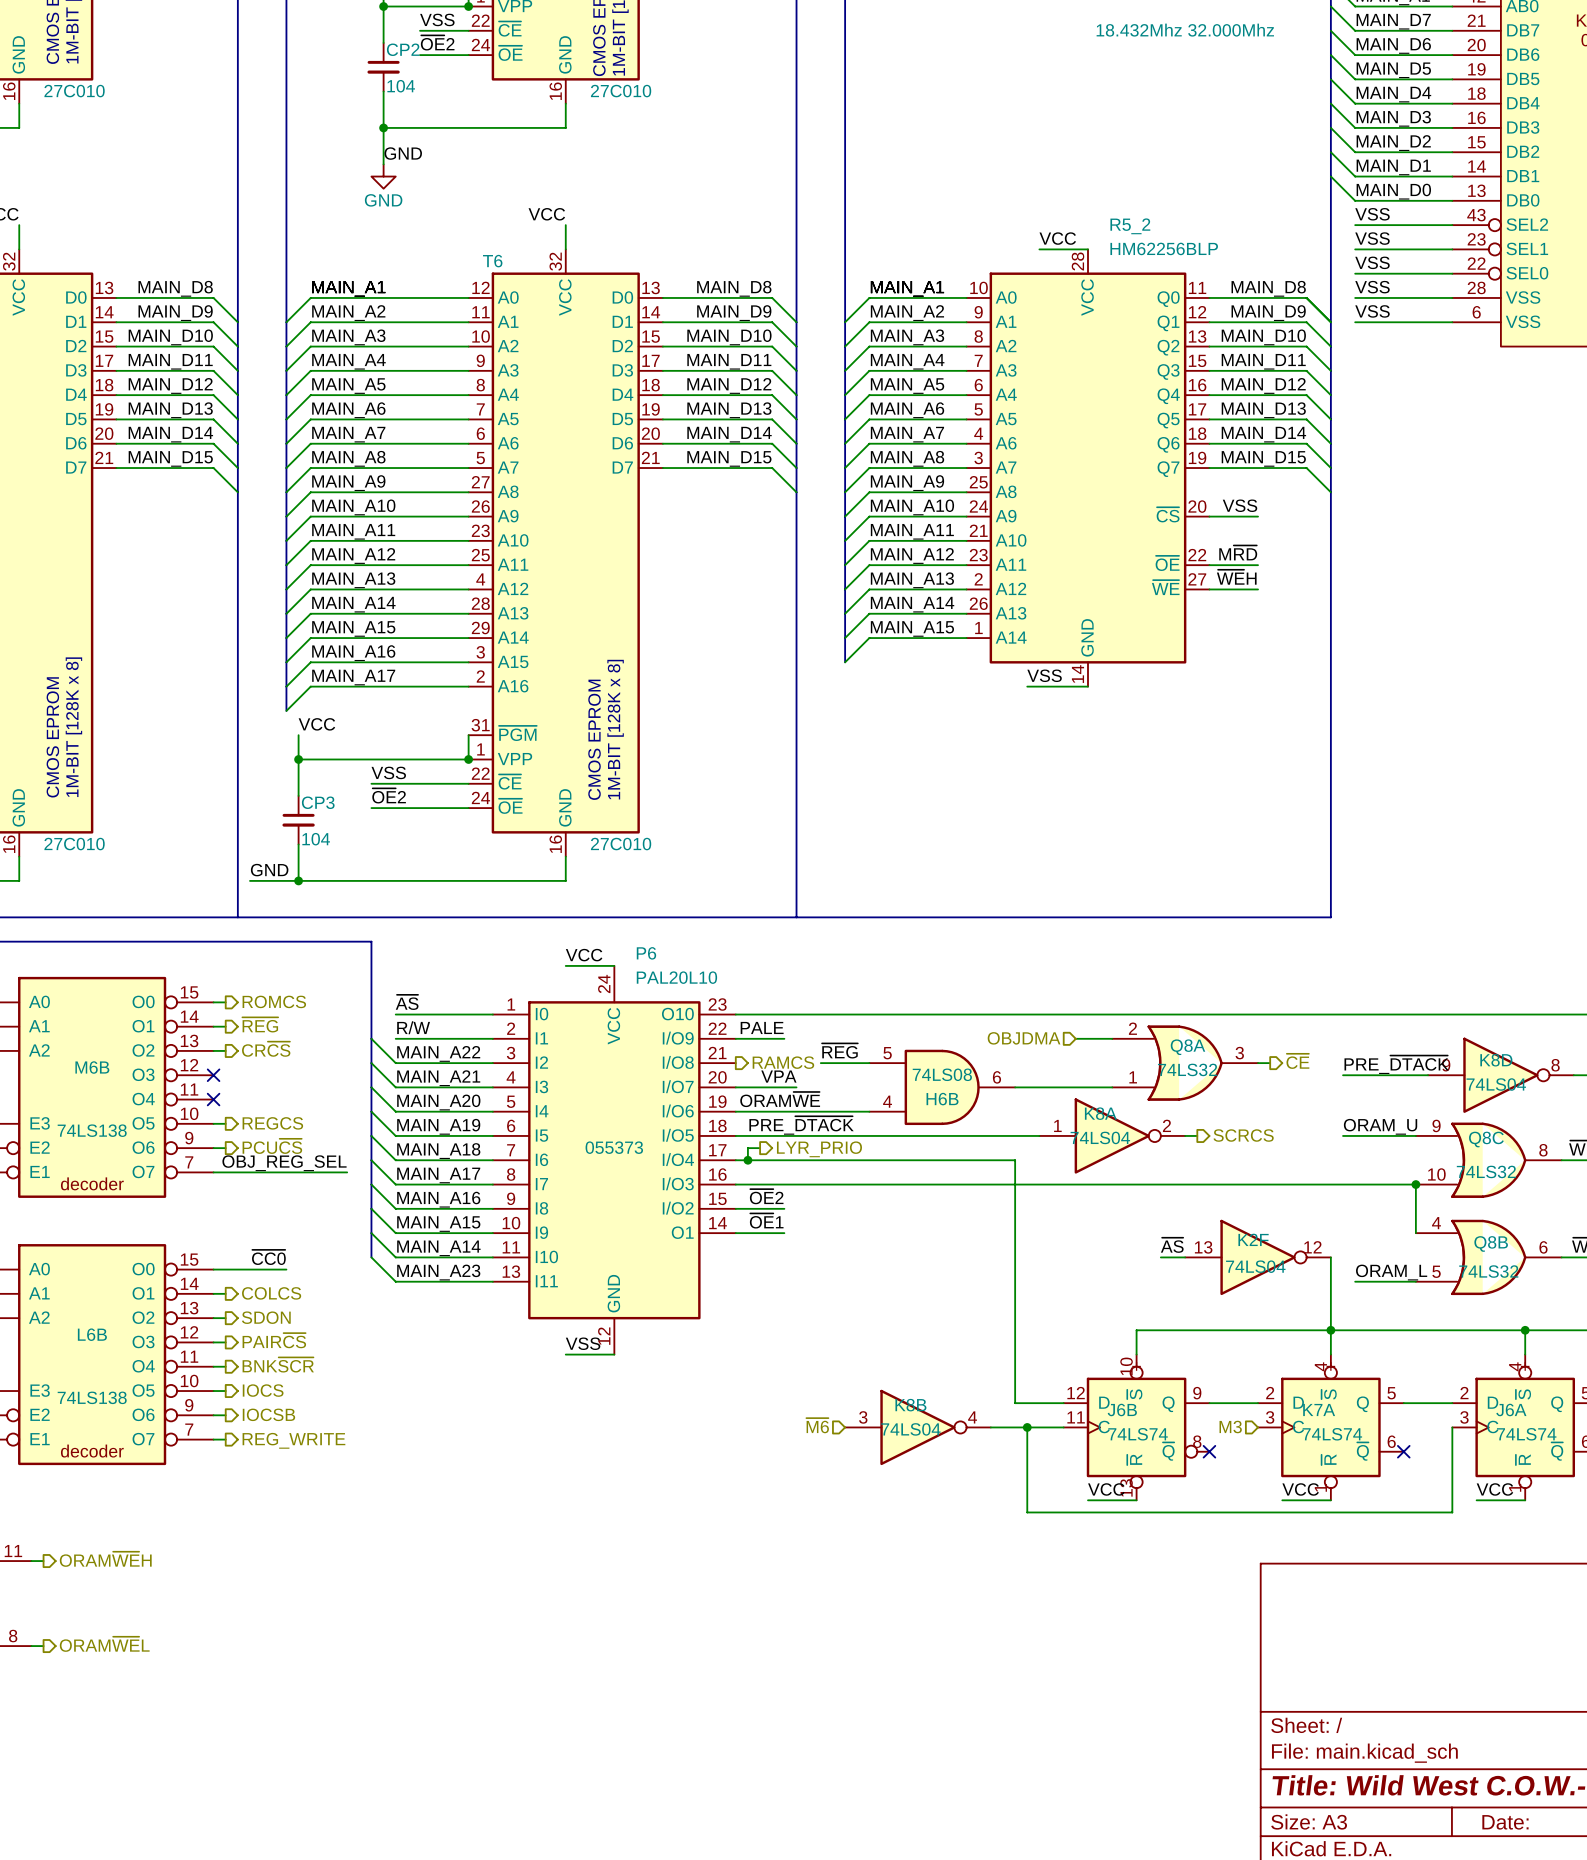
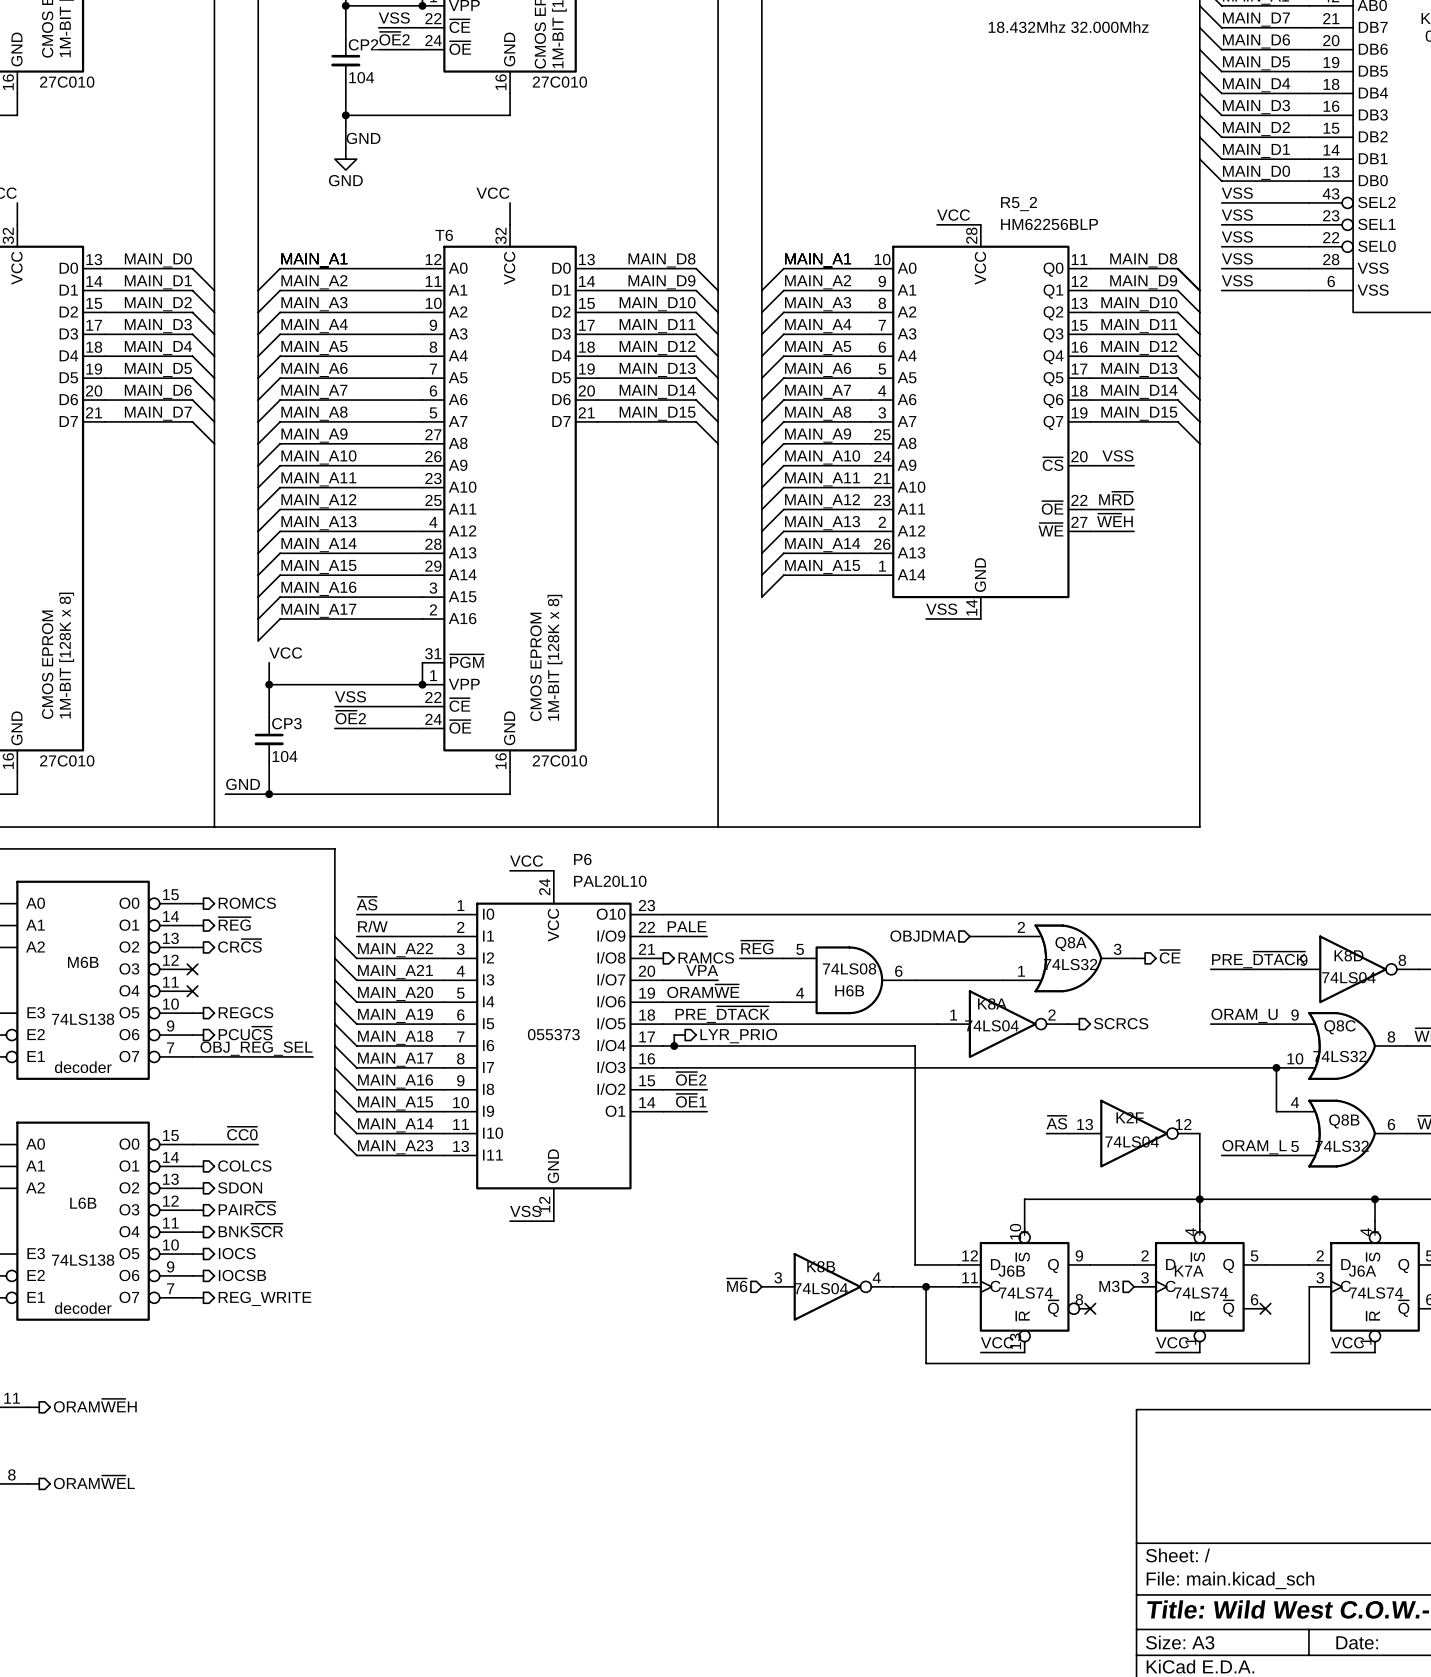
label: MAIN_D8 (175, 288) -> MAIN_D0 (158, 260)
label: MAIN_D9 (175, 313) -> MAIN_D1 (158, 282)
label: MAIN_D10 (170, 337) -> MAIN_D2 (158, 304)
label: MAIN_D11 (170, 361) -> MAIN_D3 (158, 326)
label: MAIN_D12 (170, 385) -> MAIN_D4 (158, 348)
label: MAIN_D13 (170, 410) -> MAIN_D5 (158, 369)
label: MAIN_D14 (170, 434) -> MAIN_D6 (158, 391)
label: MAIN_D15 (170, 458) -> MAIN_D7 (158, 413)

